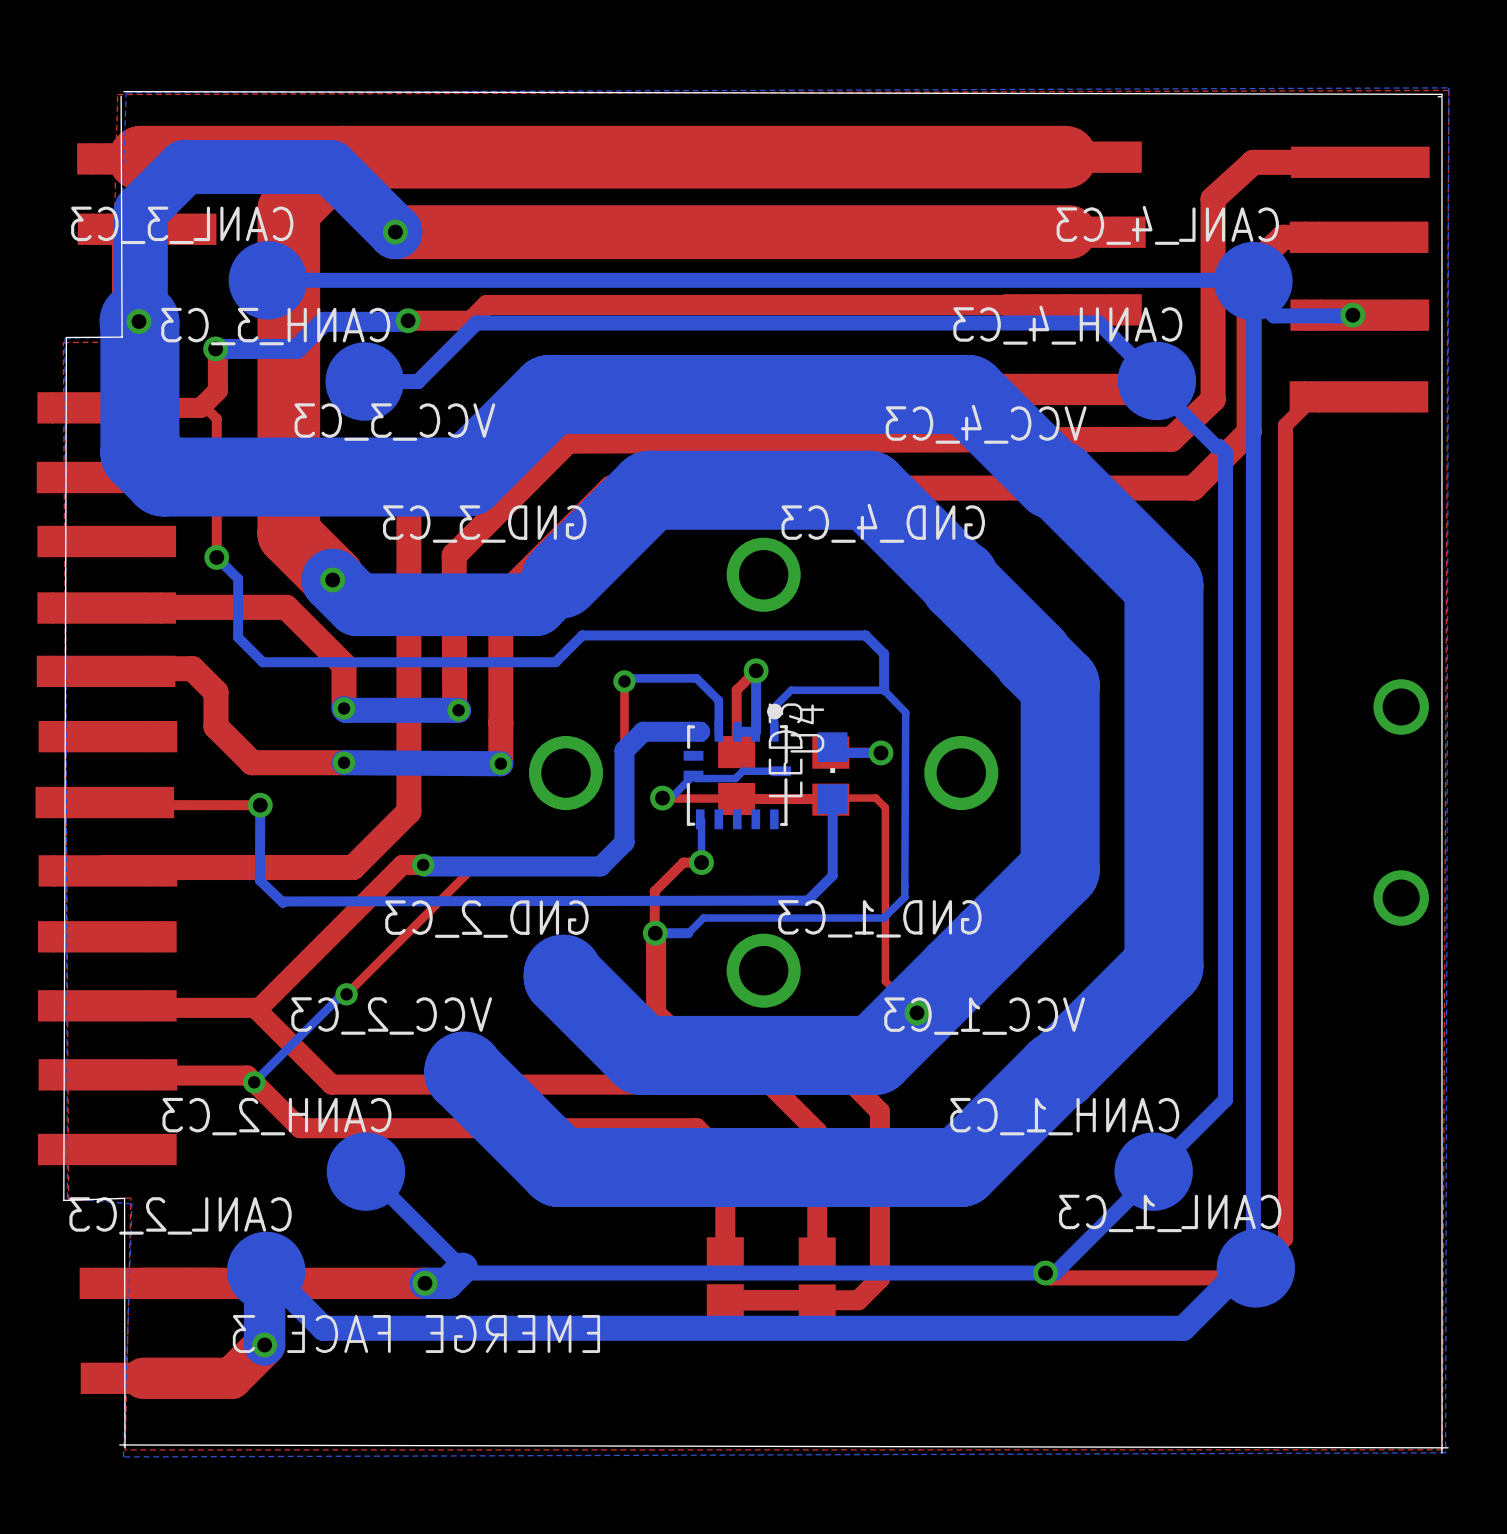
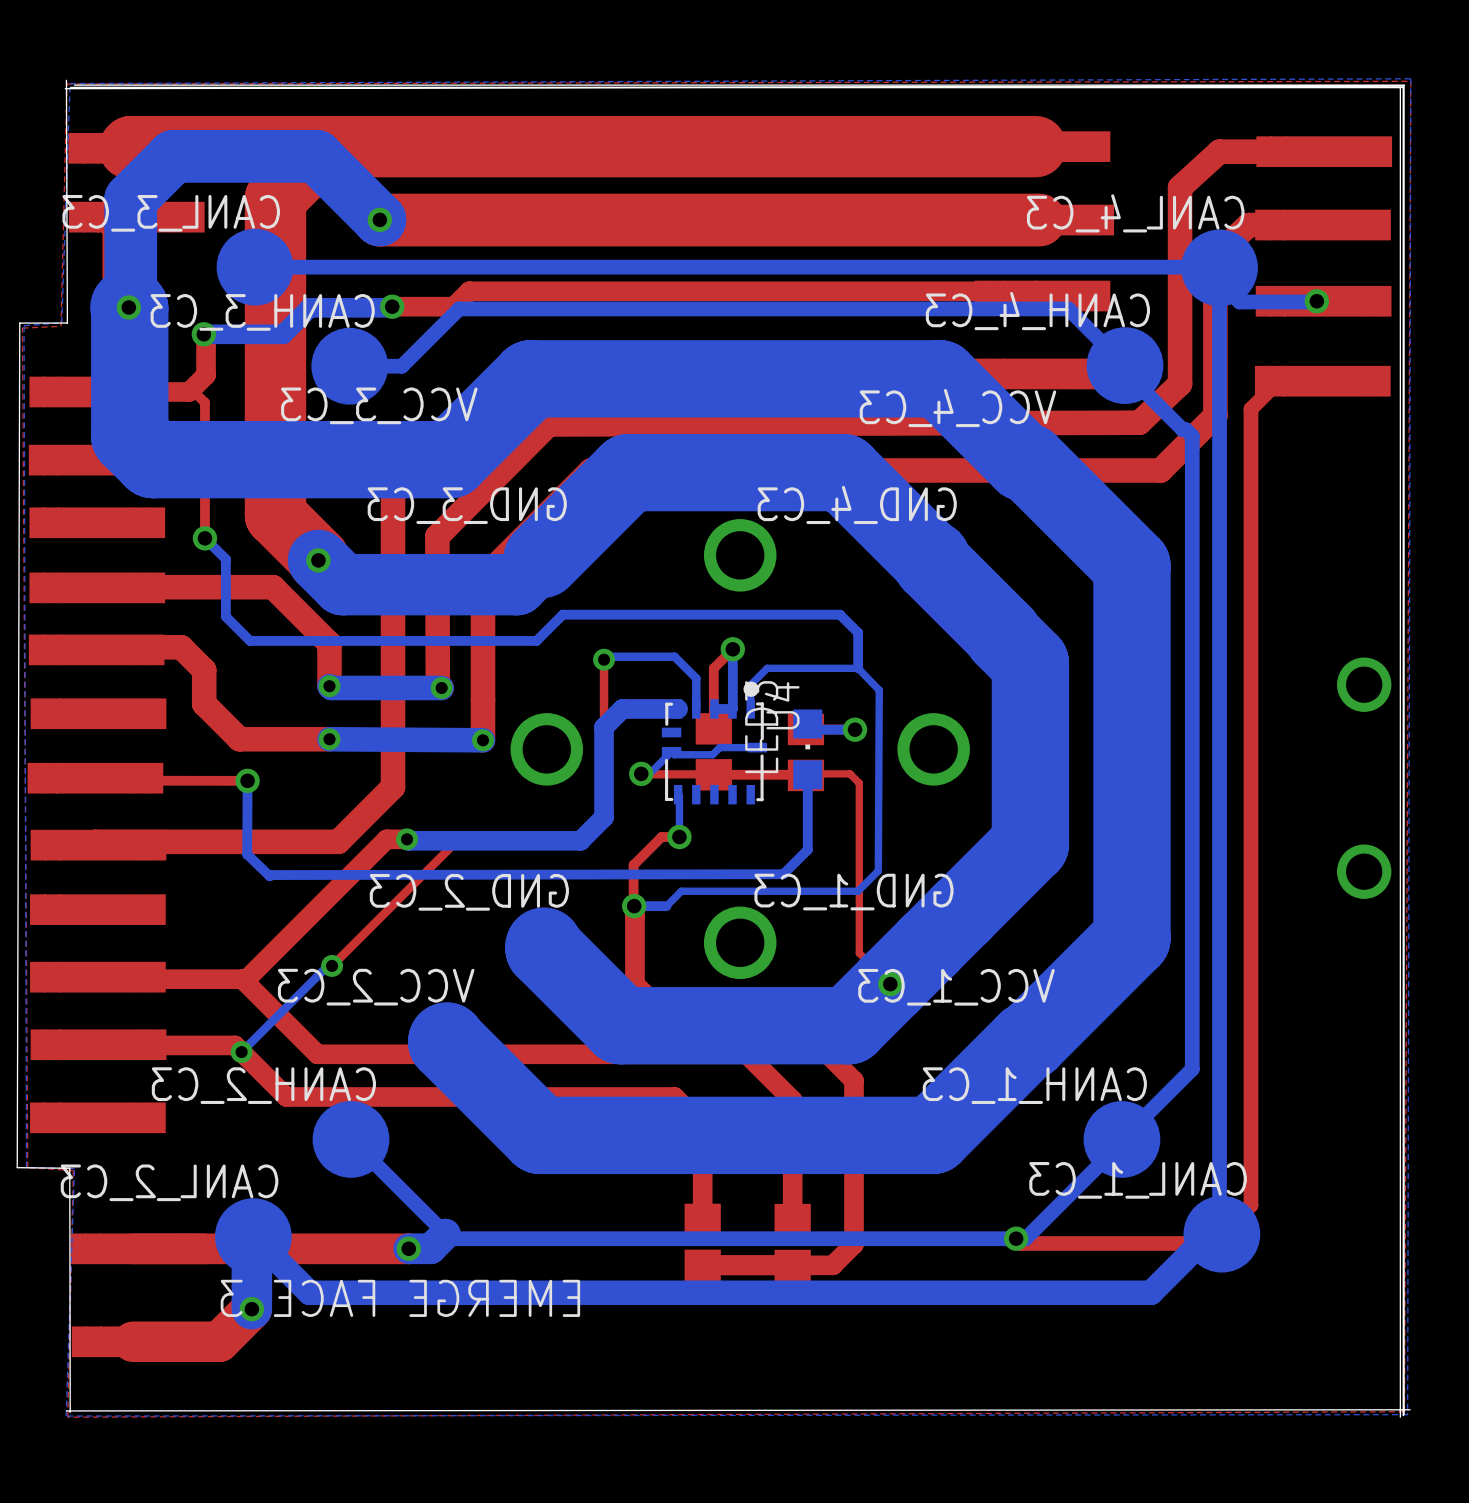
board edge: none -> (66, 80) (67, 323) (19, 323) (17, 1167) (69, 1168) (70, 1412)
top zone outline: (1448, 90) (117, 94) (111, 342) (63, 342) (68, 1200) (130, 1197) (125, 1450) (1442, 1449) -> (1410, 81) (66, 84) (60, 326) (22, 328) (27, 1167) (73, 1170) (67, 1417) (1404, 1411)
board edge: (123, 91) (1441, 94) -> (74, 85) (1404, 85)
bottom zone outline: (126, 92) (117, 337) (64, 338) (67, 1198) (132, 1203) (123, 1456) (1445, 1452) -> (116, 83) (70, 83) (61, 322) (24, 325) (26, 1167) (74, 1168) (66, 1416) (1407, 1414)
board edge: none -> (70, 87) (1400, 87) (1400, 1417)
board edge: (121, 96) (122, 337) (66, 337) (63, 1200) (124, 1198) (124, 1447) -> none
board edge: none -> (65, 88) (1403, 85) (1403, 1415)
board edge: (119, 1444) (1448, 1447) -> (66, 1410) (1410, 1409)

